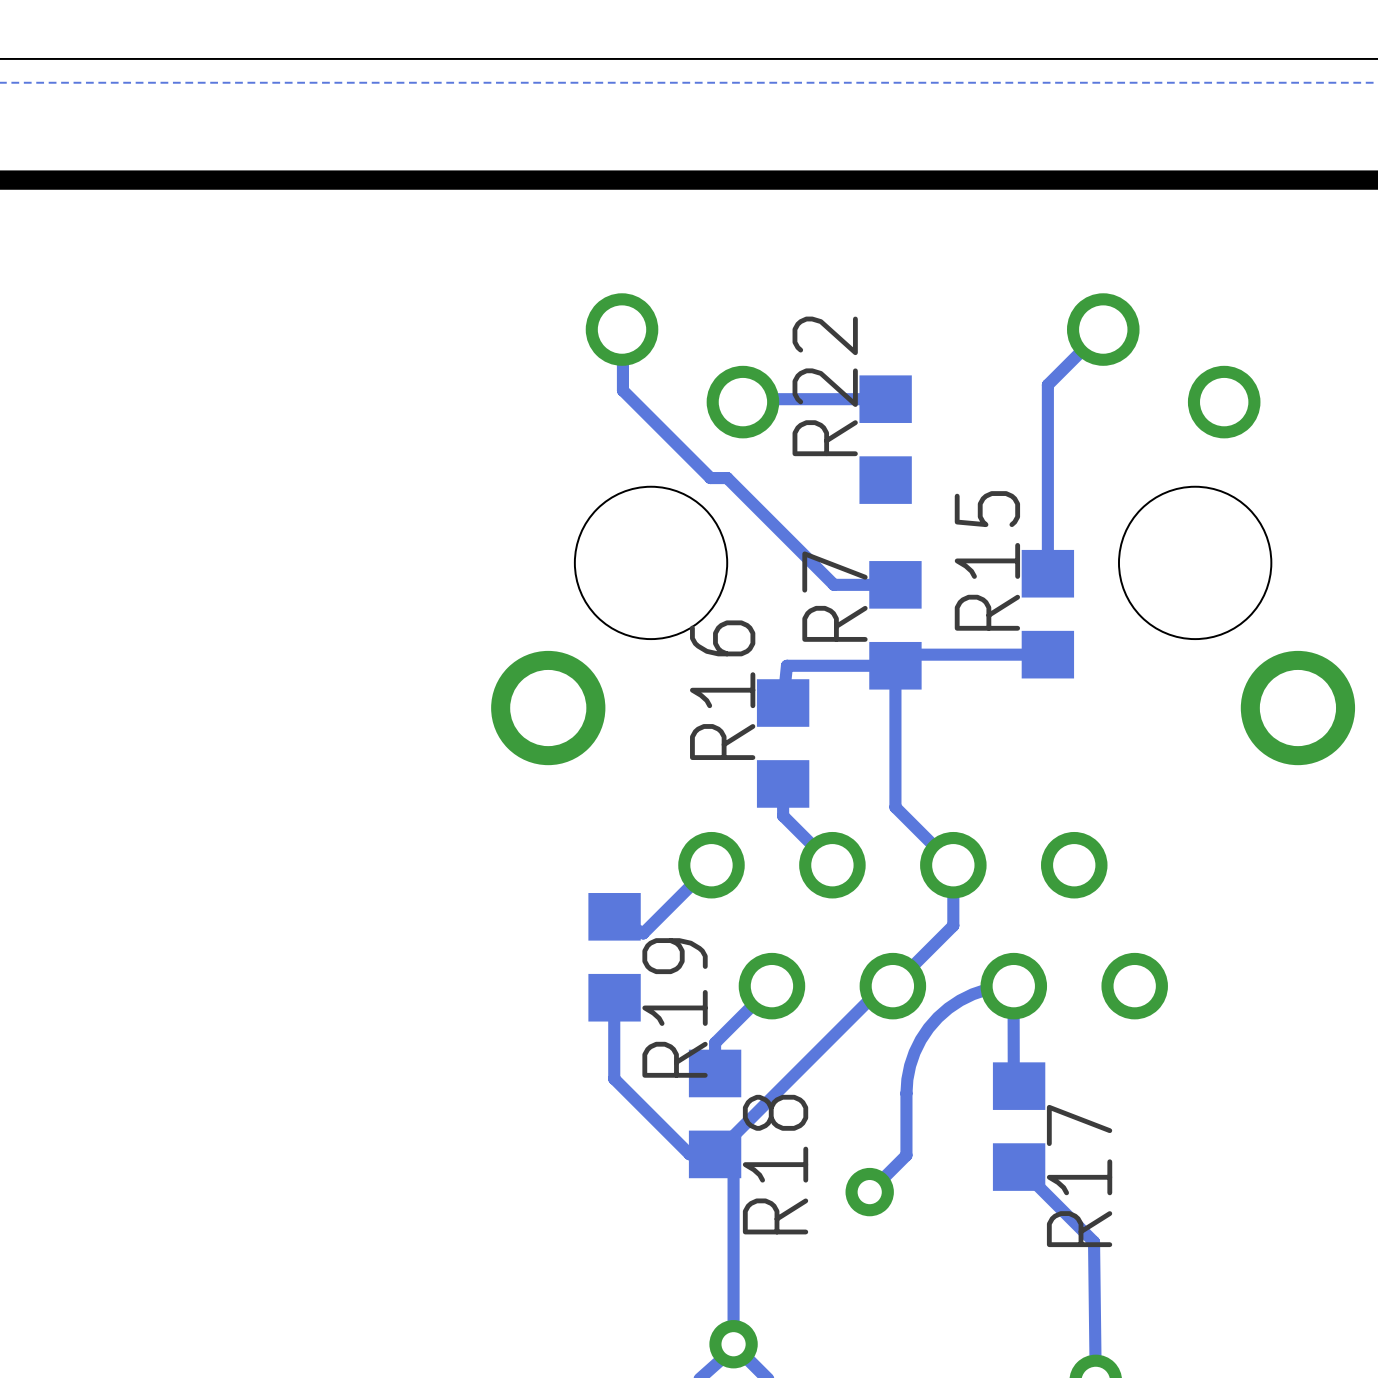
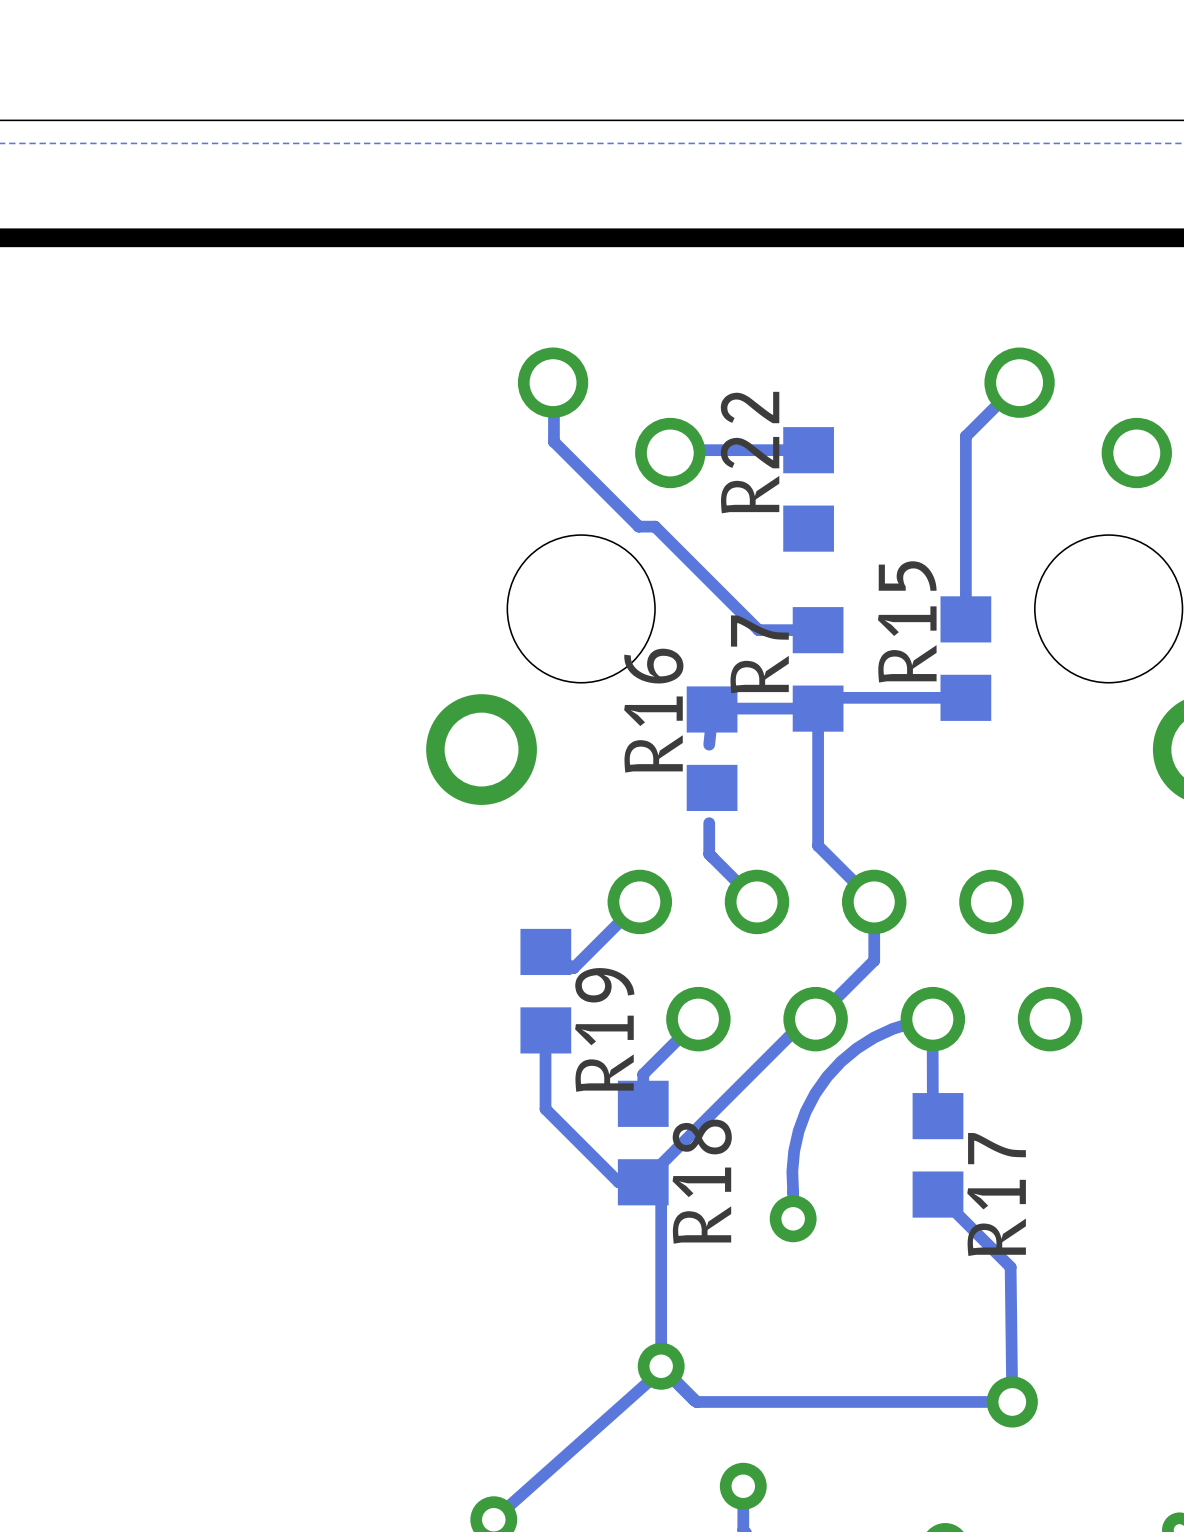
R16 position: (783, 743) -> (712, 748)
track: (1013, 986) (986, 989) (960, 1000) (948, 1008) (928, 1028) (914, 1052) (907, 1079) (906, 1155) (869, 1192) -> (932, 1019) (892, 1028) (874, 1037) (841, 1061) (815, 1093) (805, 1111) (794, 1151) (792, 1171) (793, 1218)

